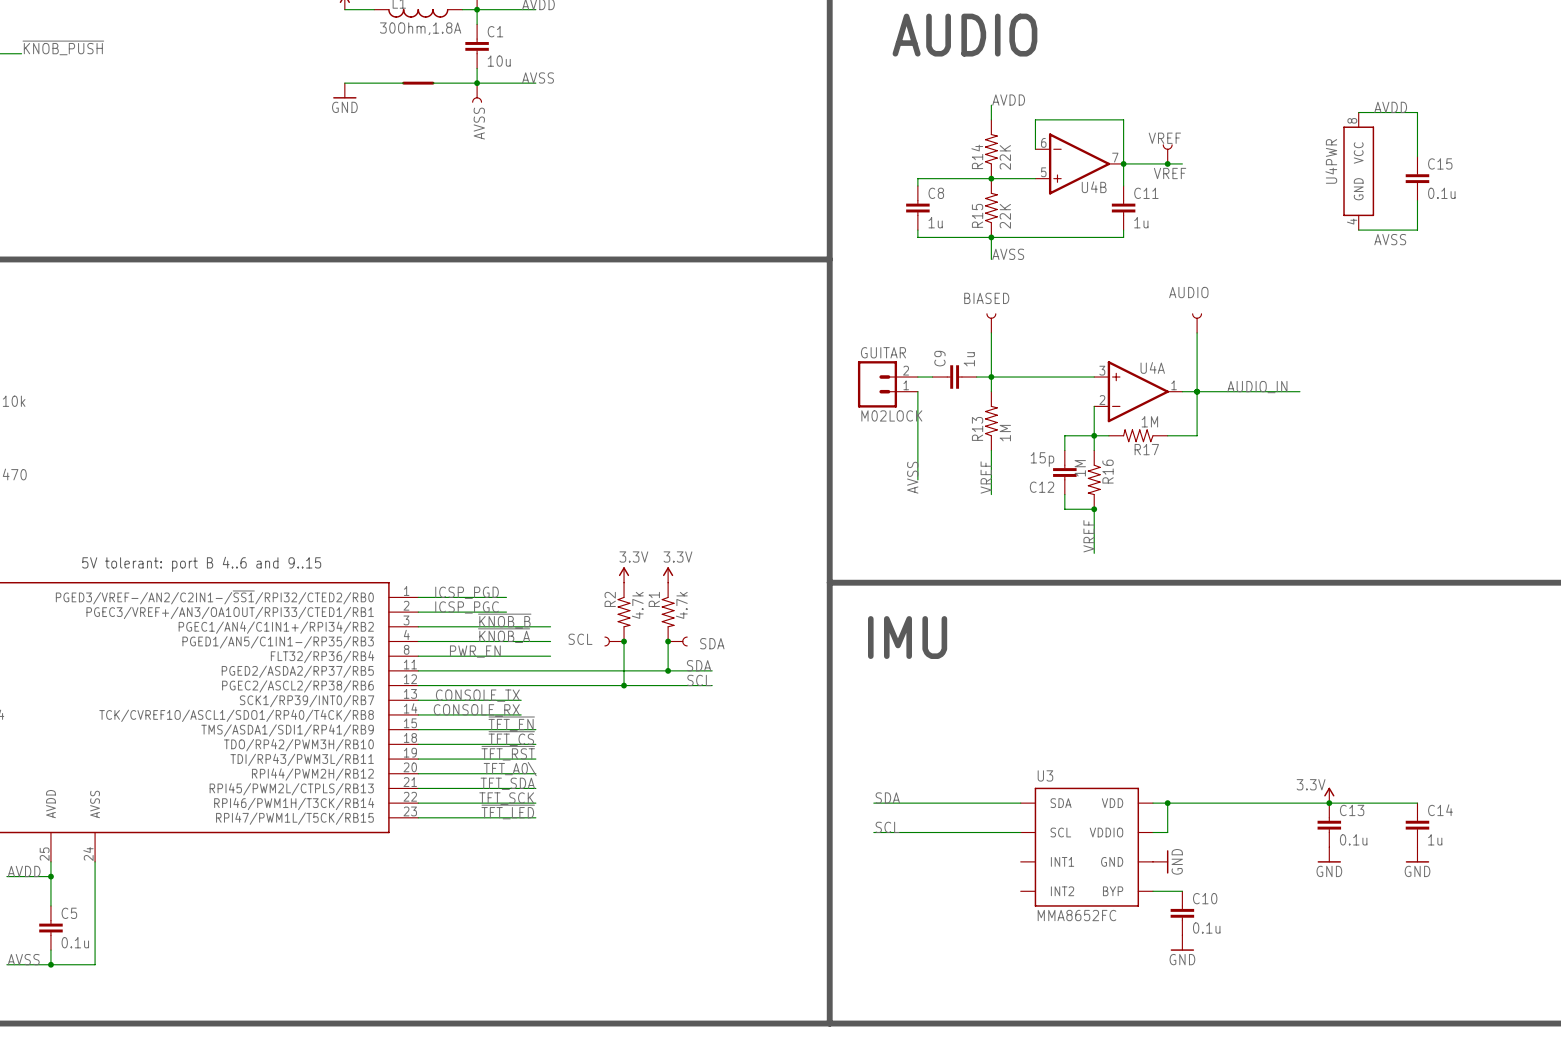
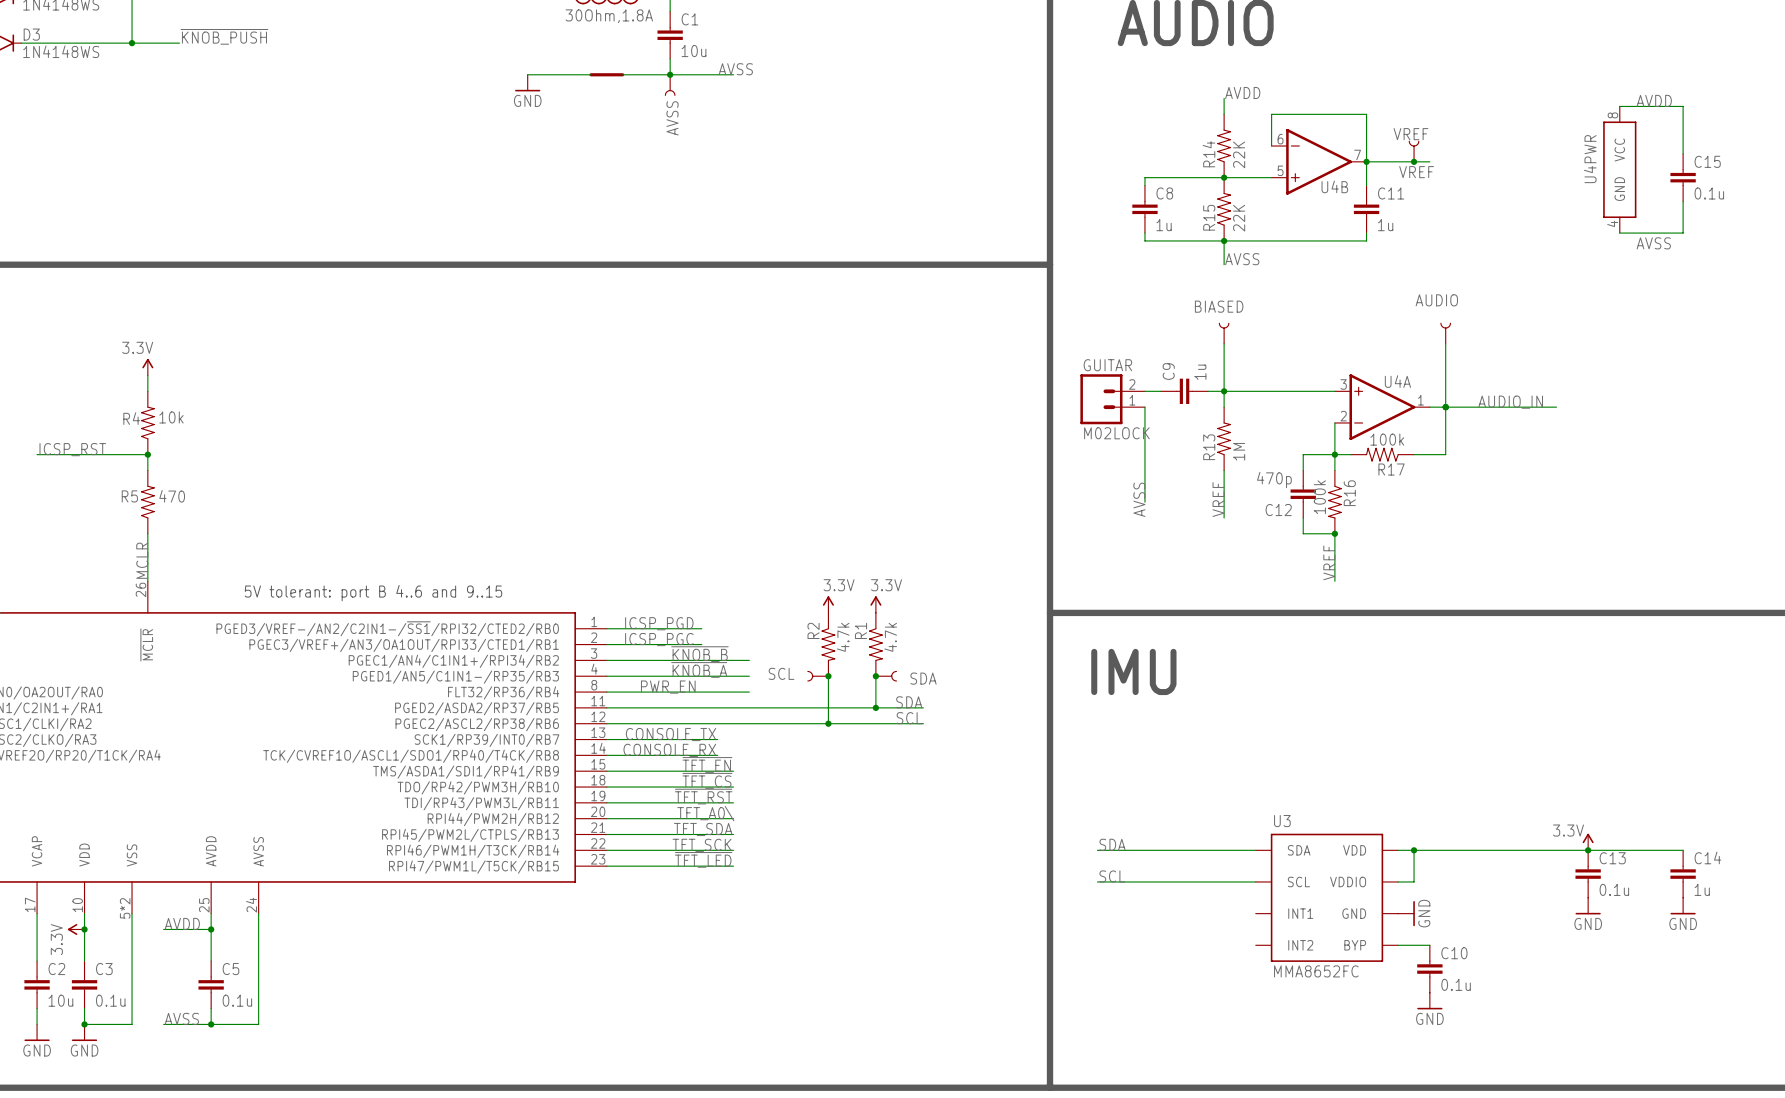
R17 value: 1M (1149, 421) -> 100k (1387, 439)
C12 value: 15p (1042, 459) -> 470p (1274, 479)
R16 value: 1M (1080, 468) -> 100k (1319, 497)

